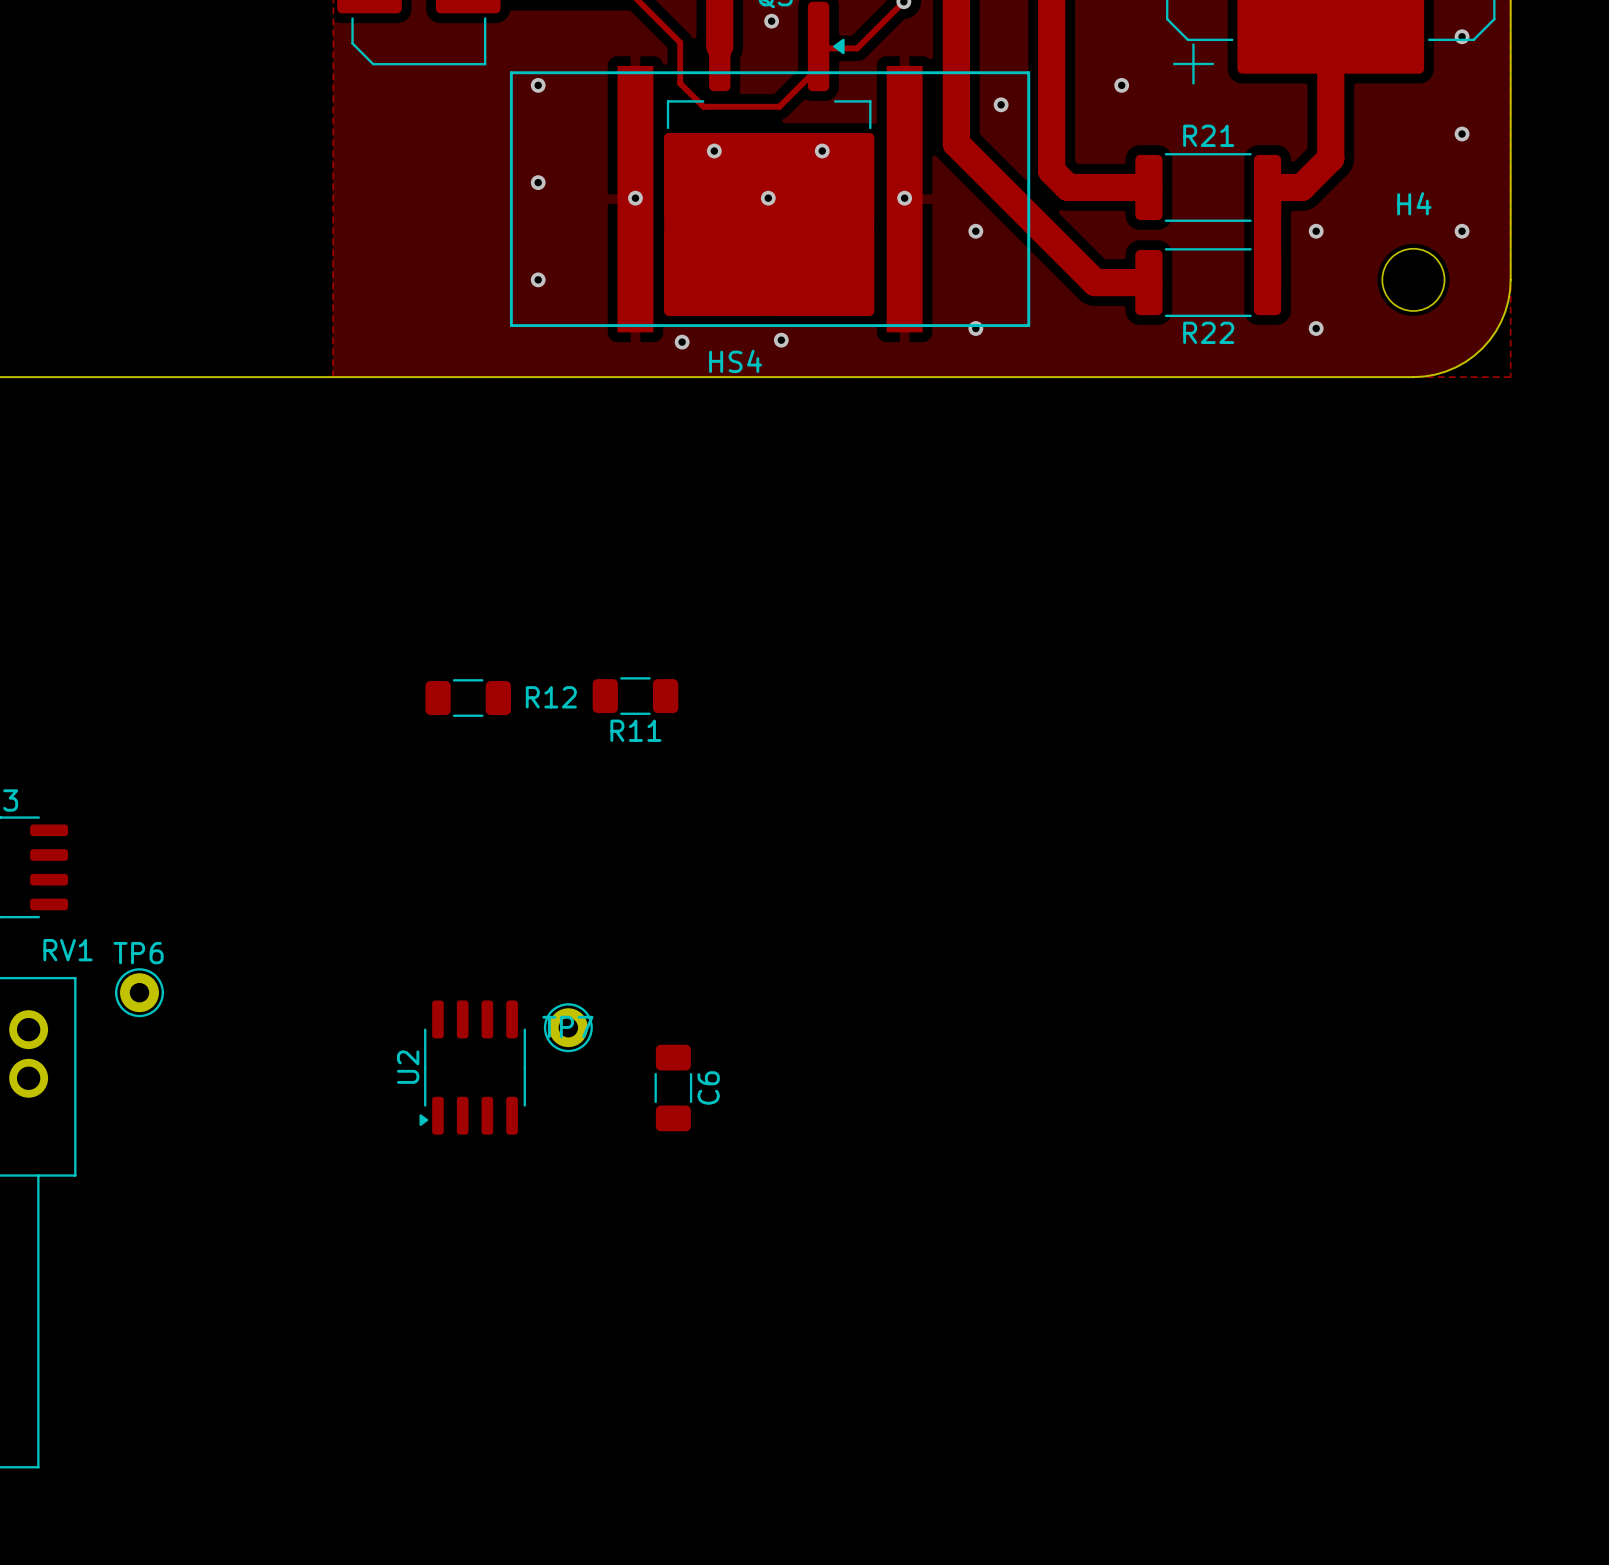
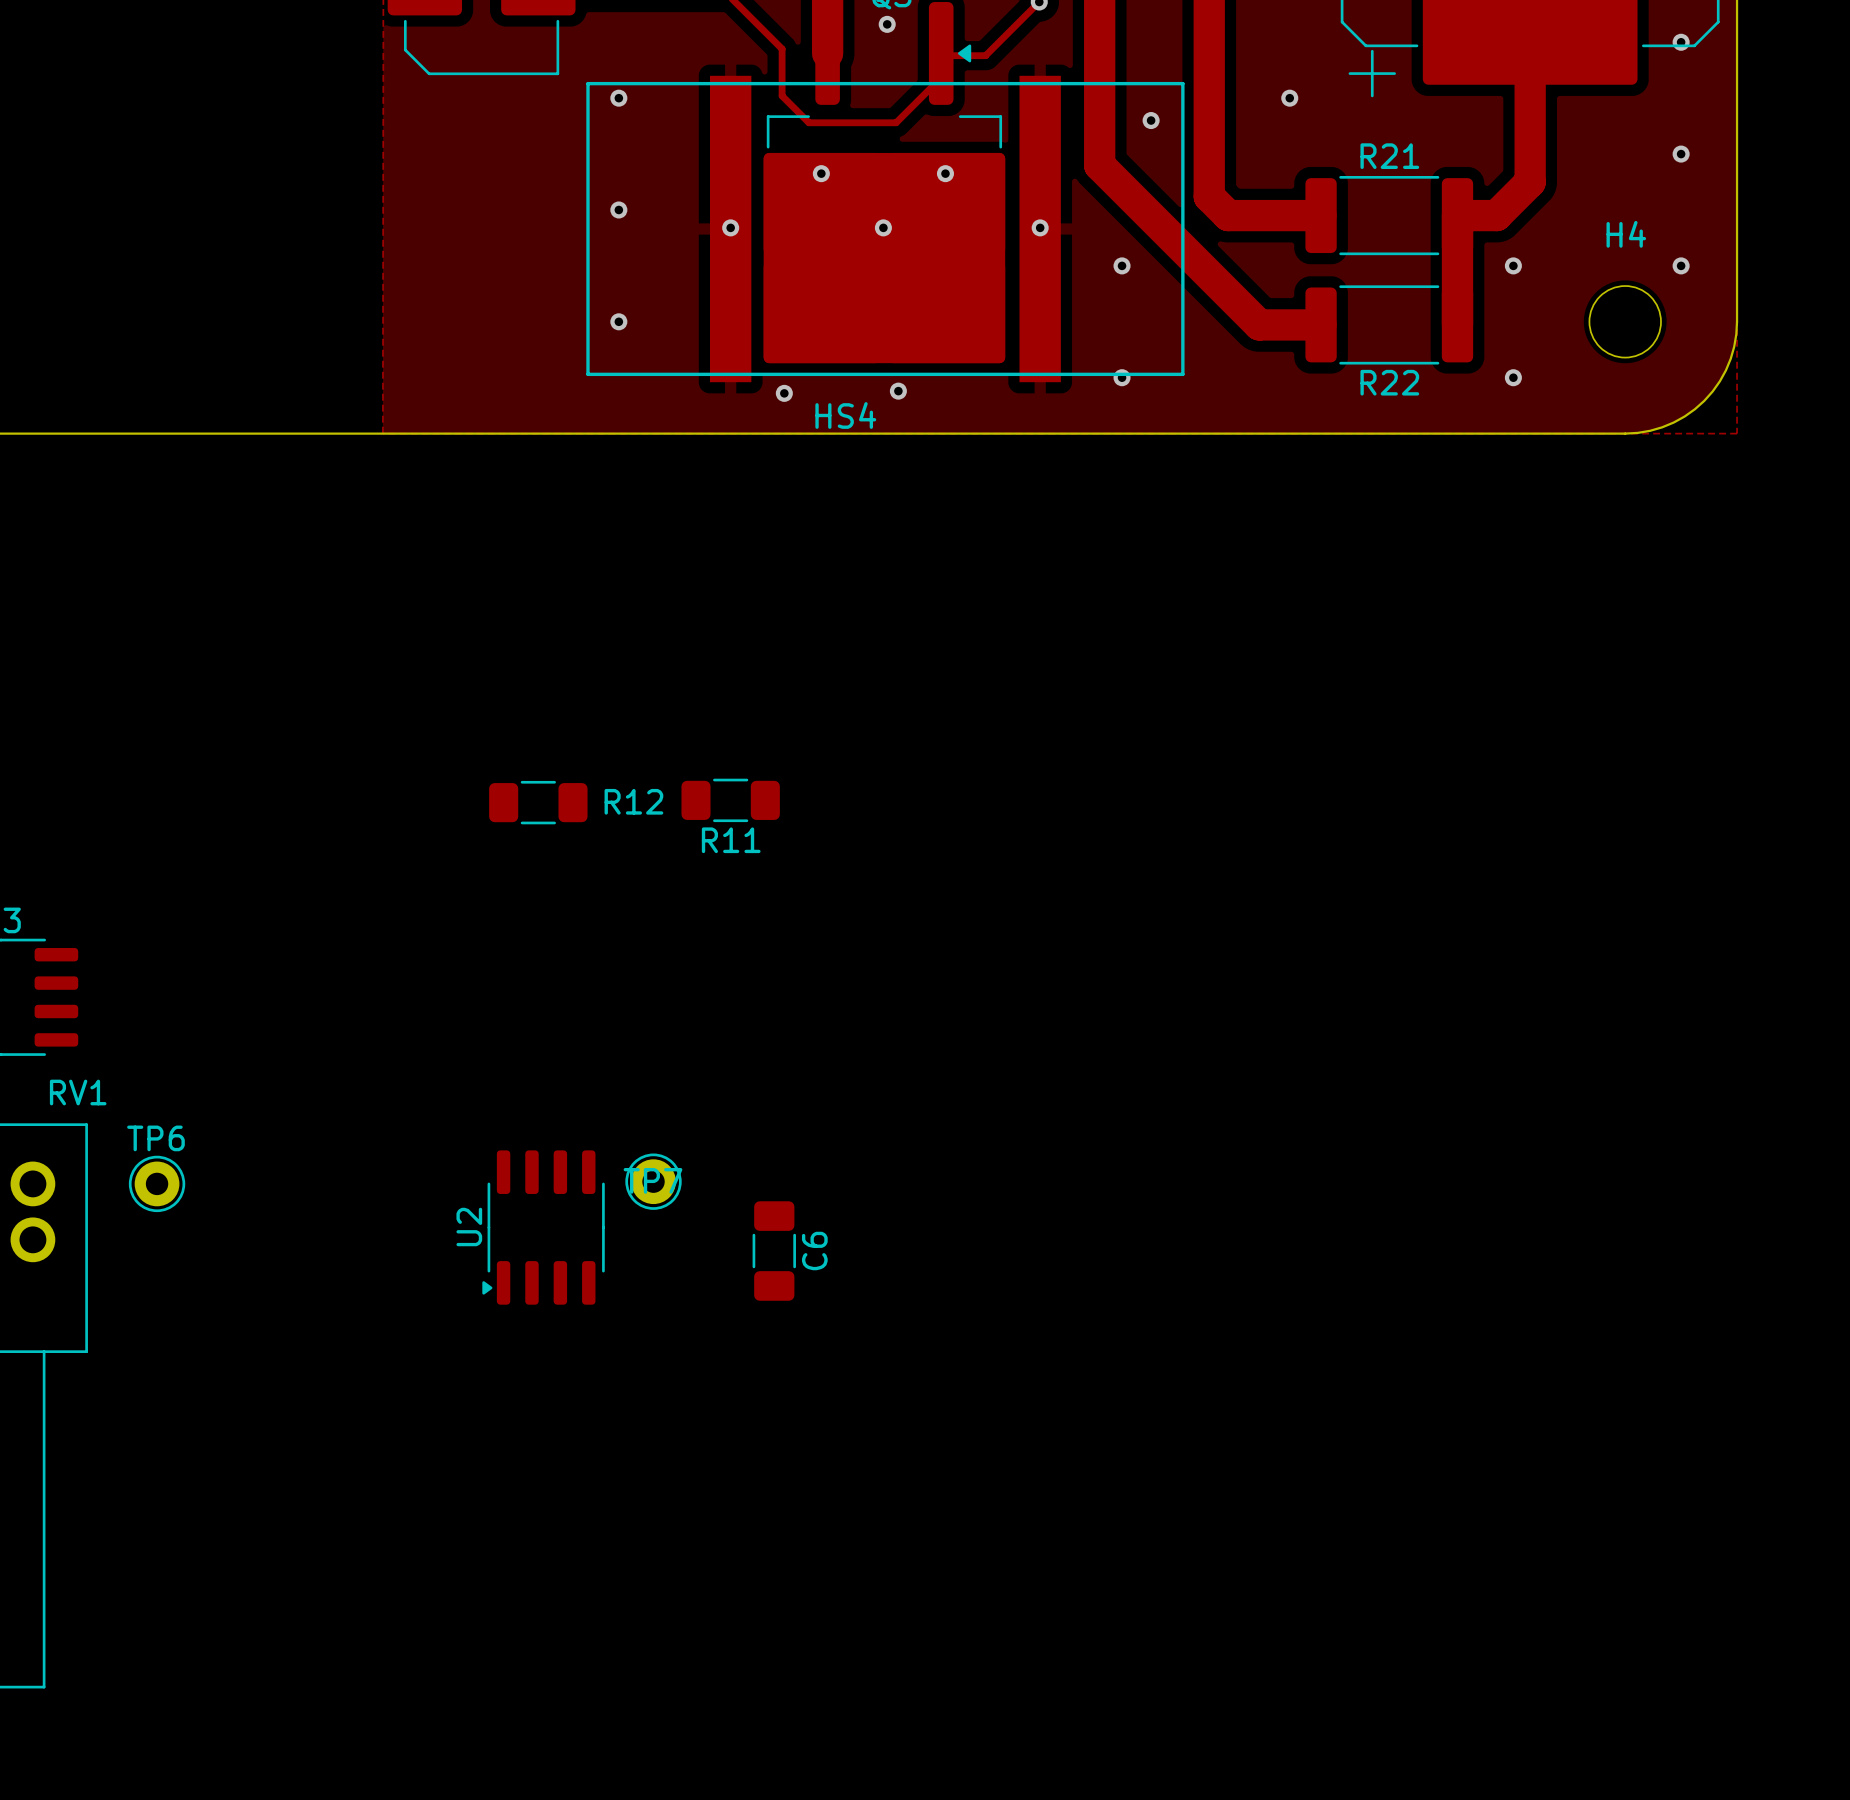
TP6 position: (139, 992) -> (157, 1183)

